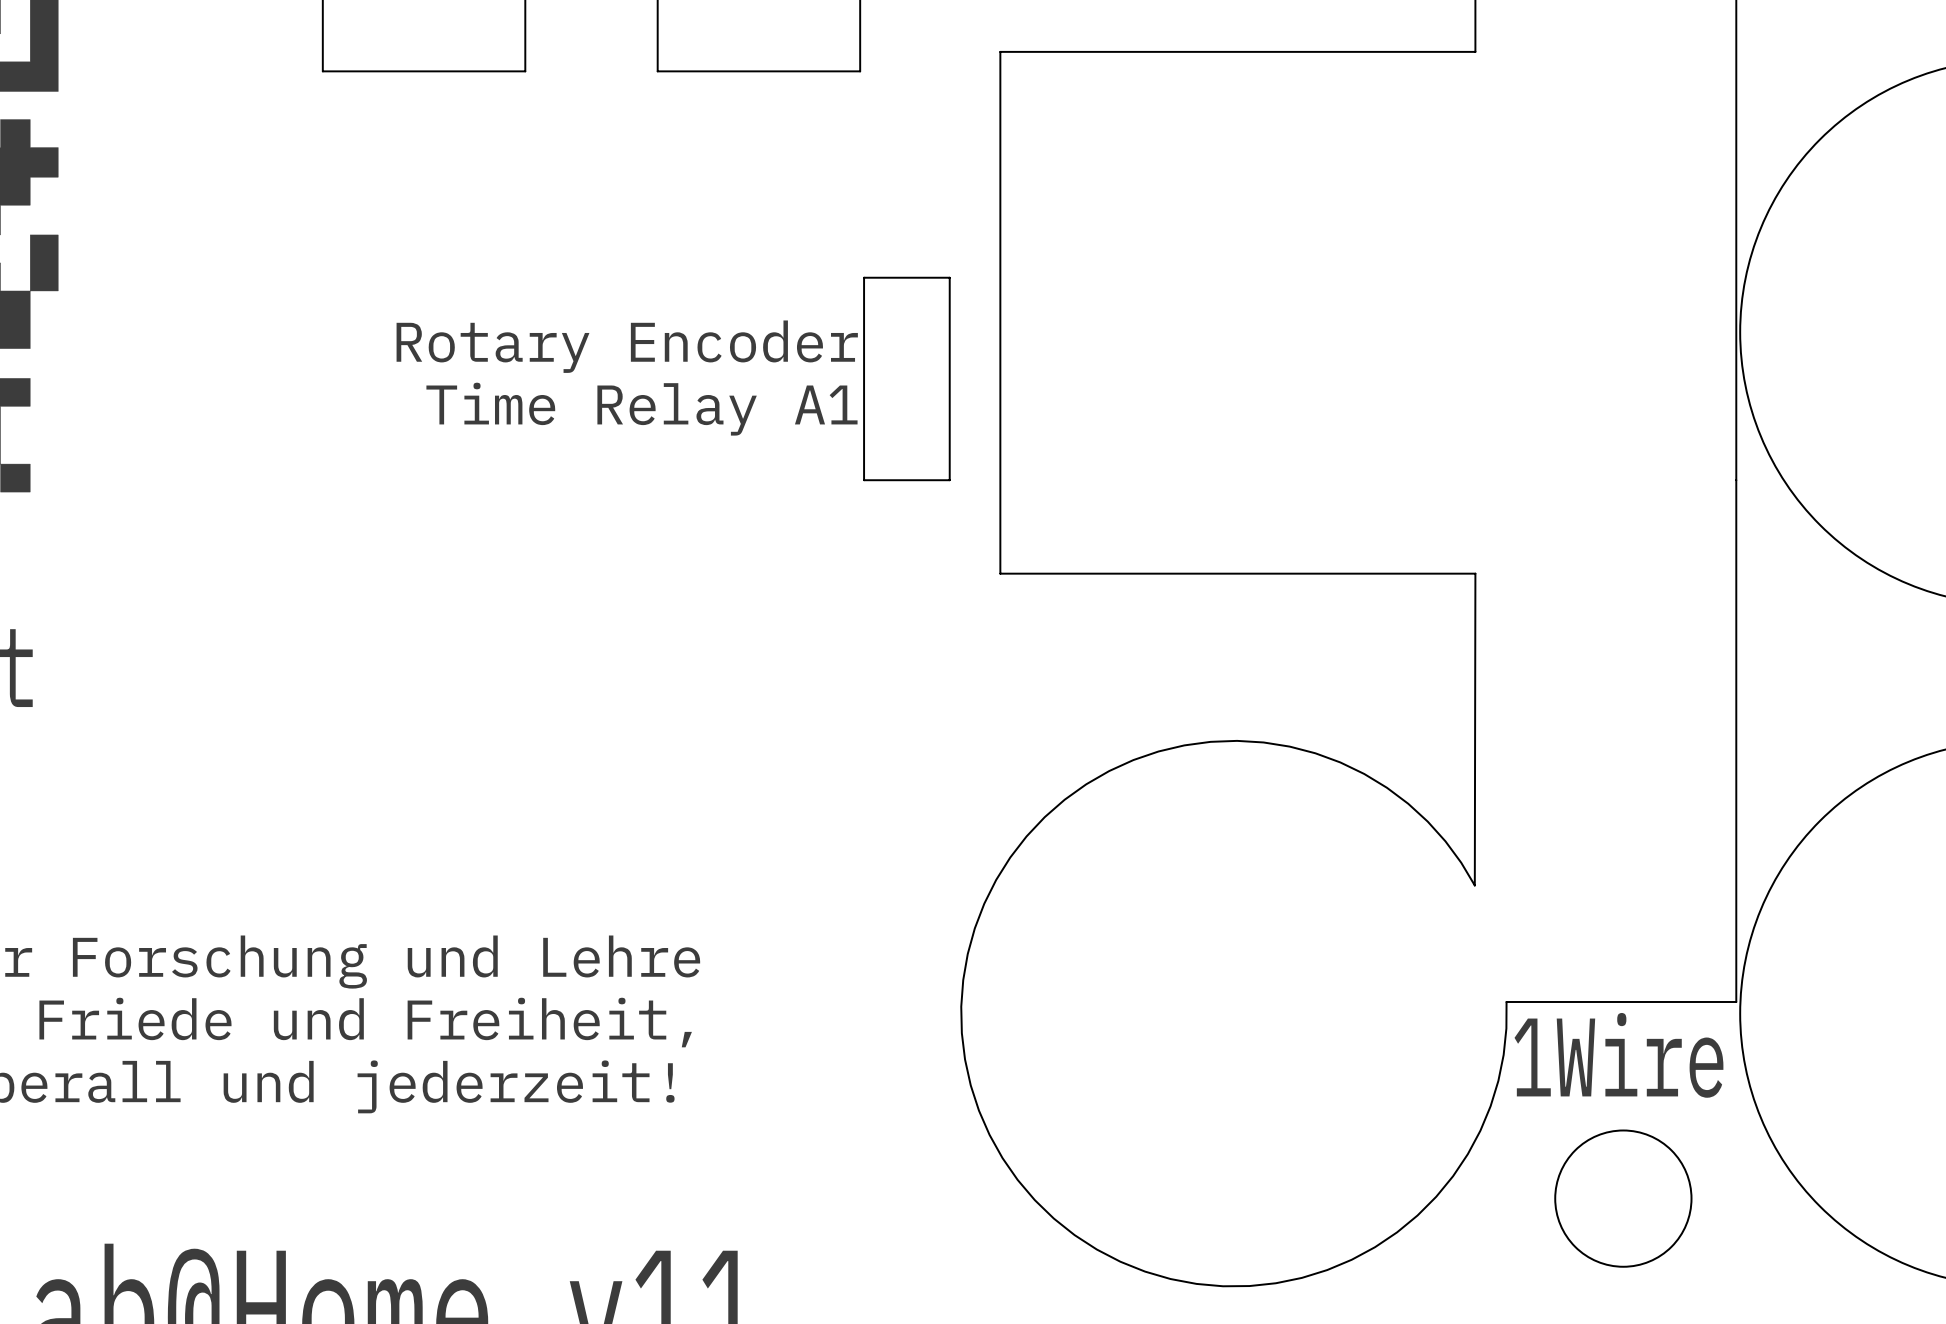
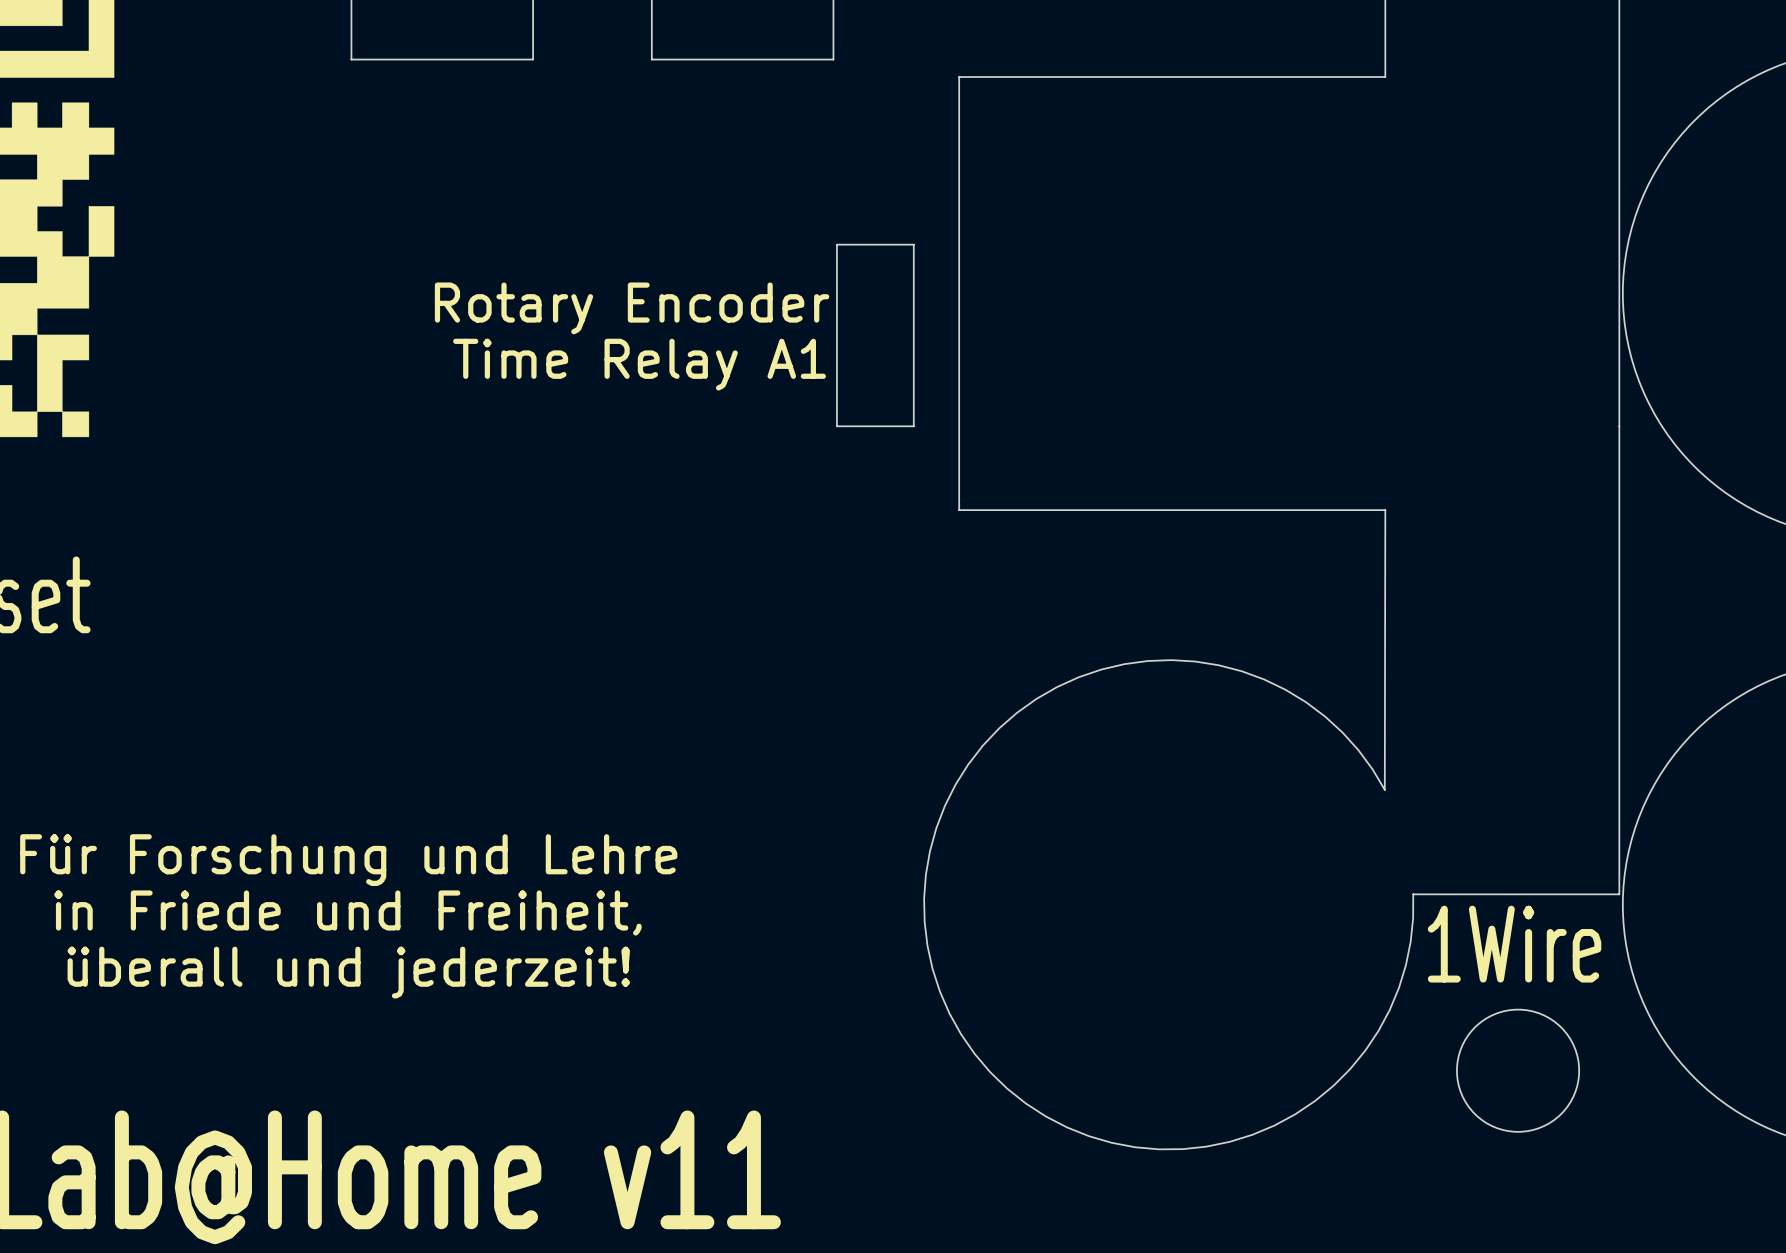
board edge: (1475, 51) (1000, 51) (1000, 90) -> (1385, 42) (1385, 77) (959, 77)

